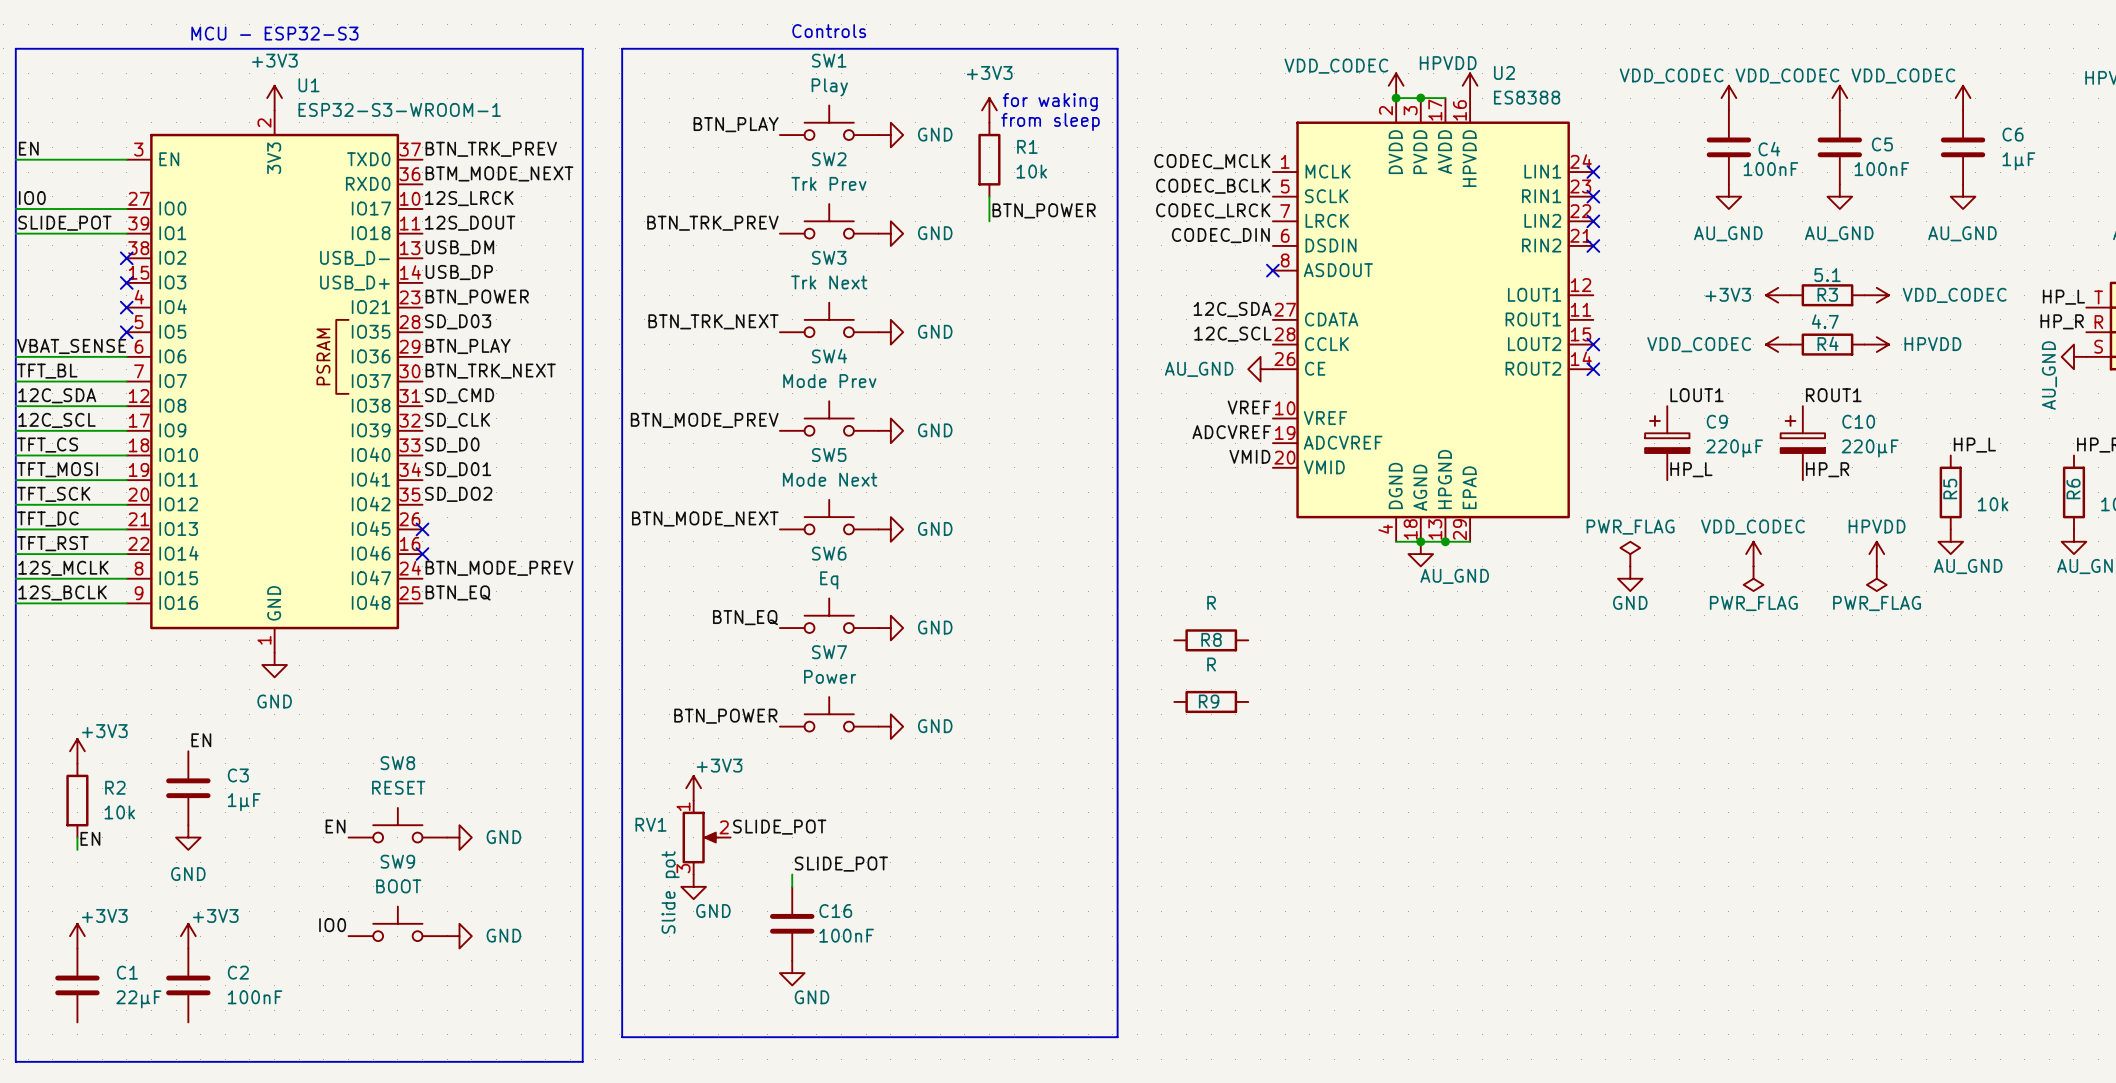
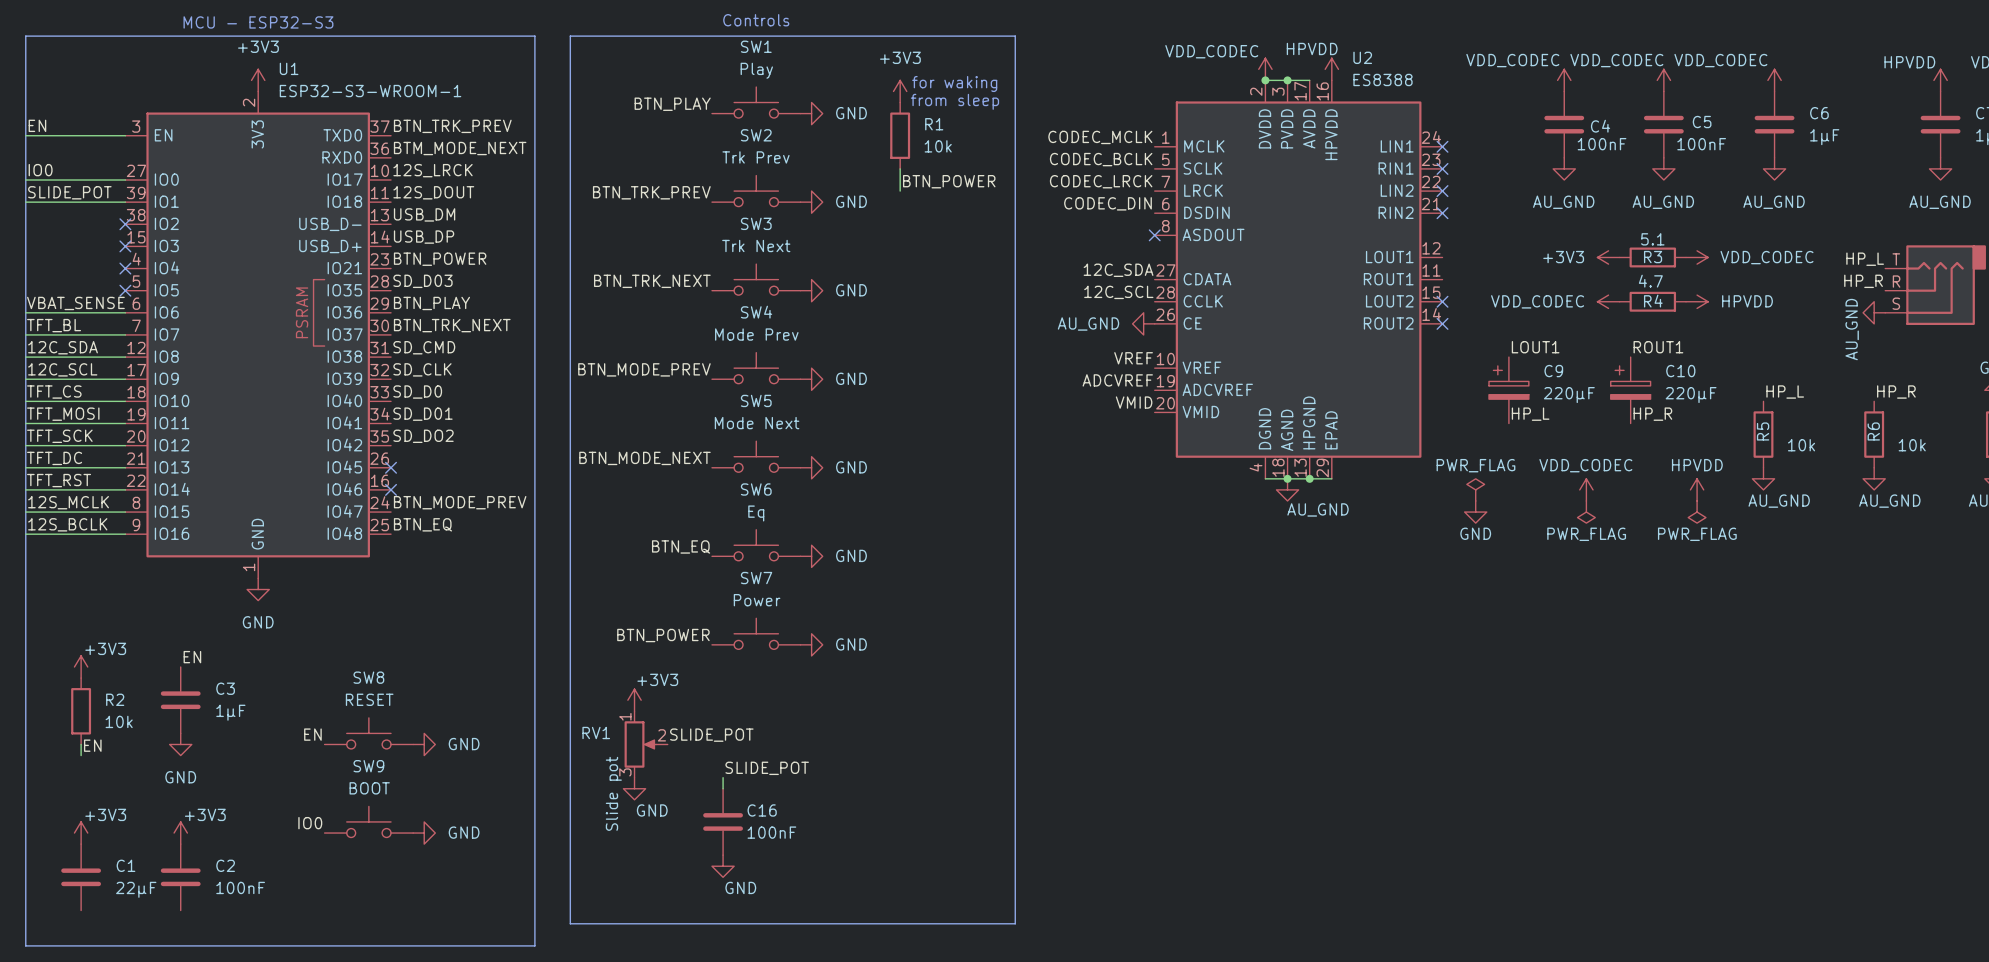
R8: R (1211, 640) -> none
R9: R (1211, 701) -> none

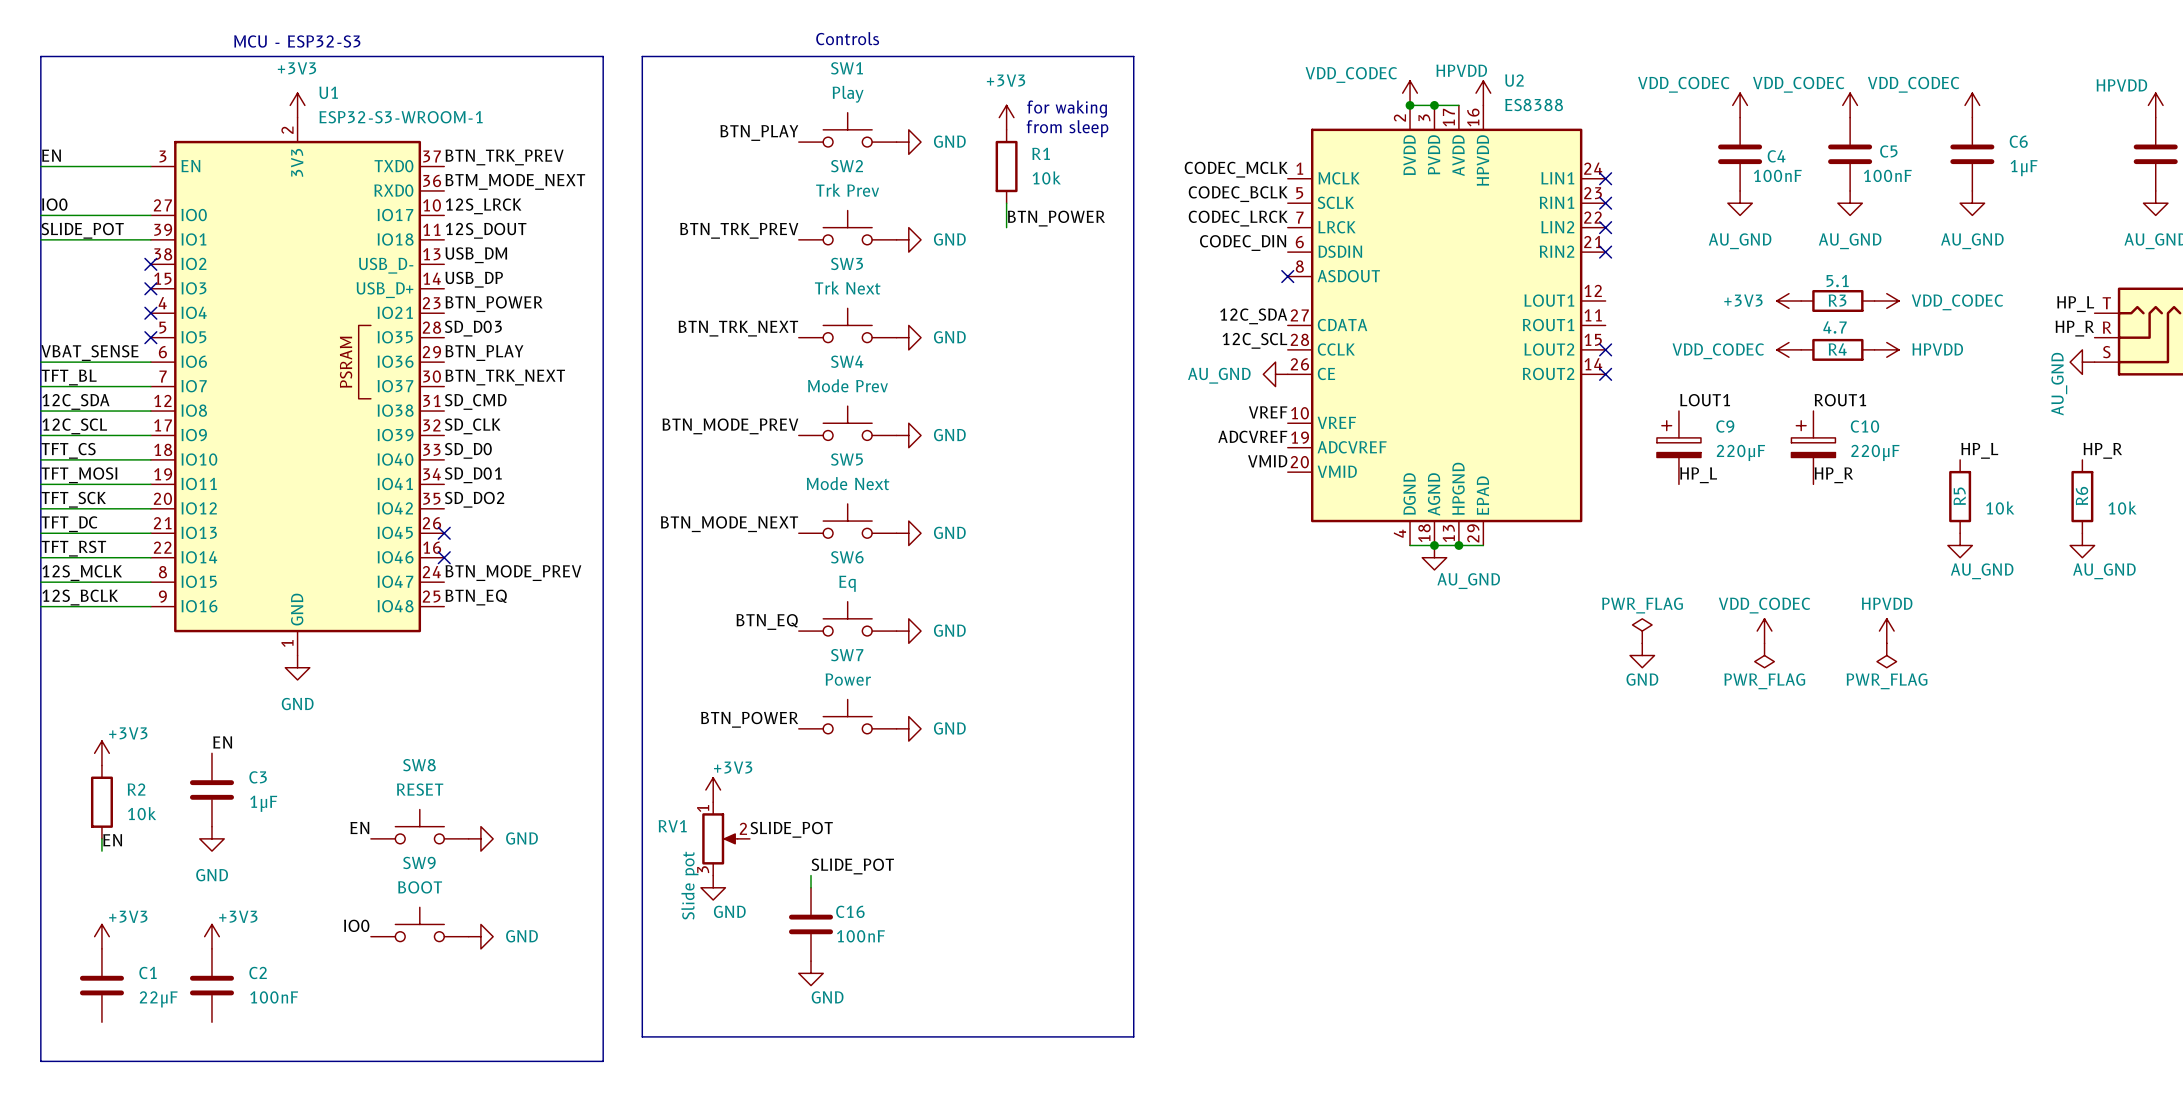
power symbol: PWR_FLAG (1475, 489) -> none
power symbol position: VDD_CODEC (1586, 489) -> VDD_CODEC (1764, 631)
power symbol position: HPVDD (1697, 489) -> HPVDD (1886, 631)
power symbol position: GND (1475, 512) -> GND (1642, 655)
power symbol: PWR_FLAG (1586, 512) -> none
power symbol: PWR_FLAG (1697, 512) -> none
power symbol: none -> PWR_FLAG (1642, 631)
power symbol: none -> PWR_FLAG (1764, 655)
power symbol: none -> PWR_FLAG (1886, 655)

